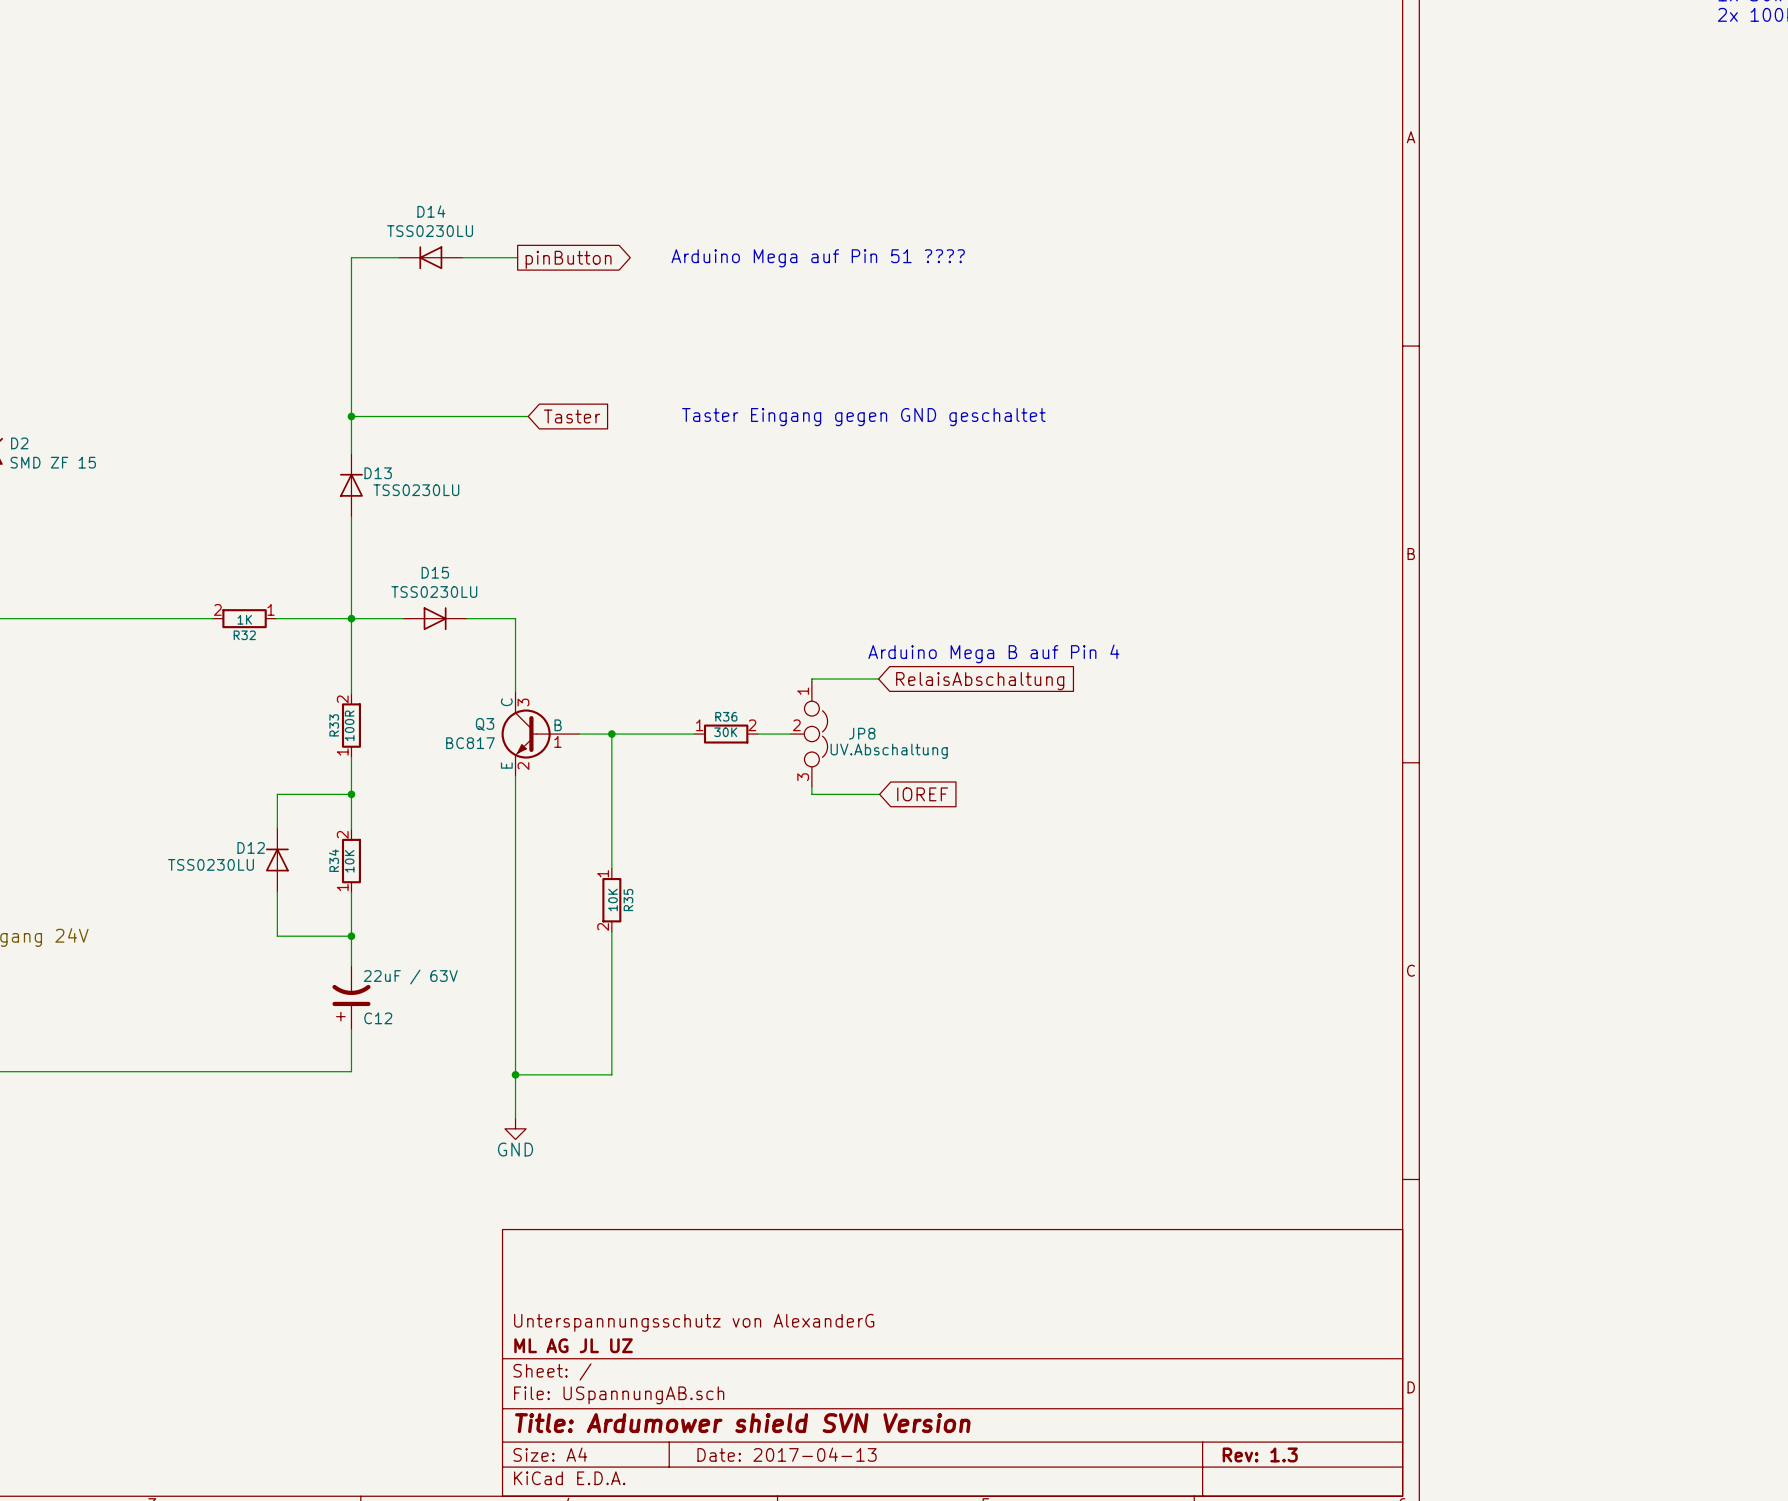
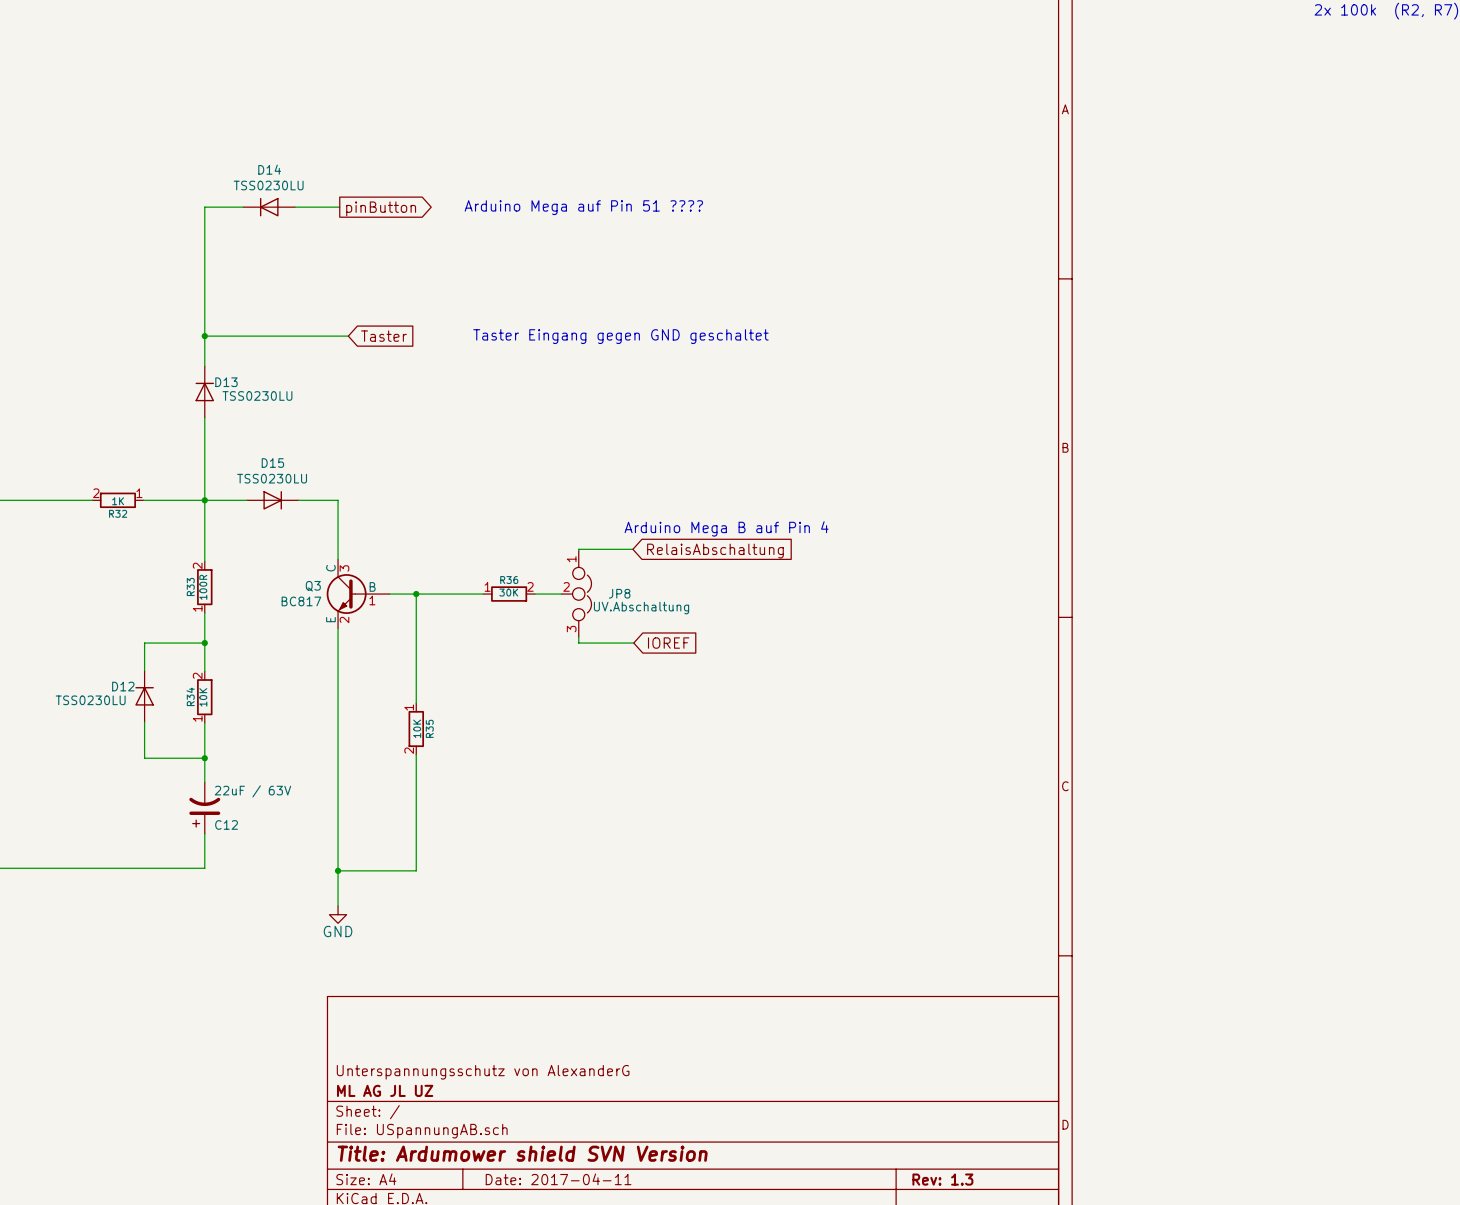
title block: Date: 2017-04-13 (787, 1454) -> Date: 2017-04-11 (558, 1179)

